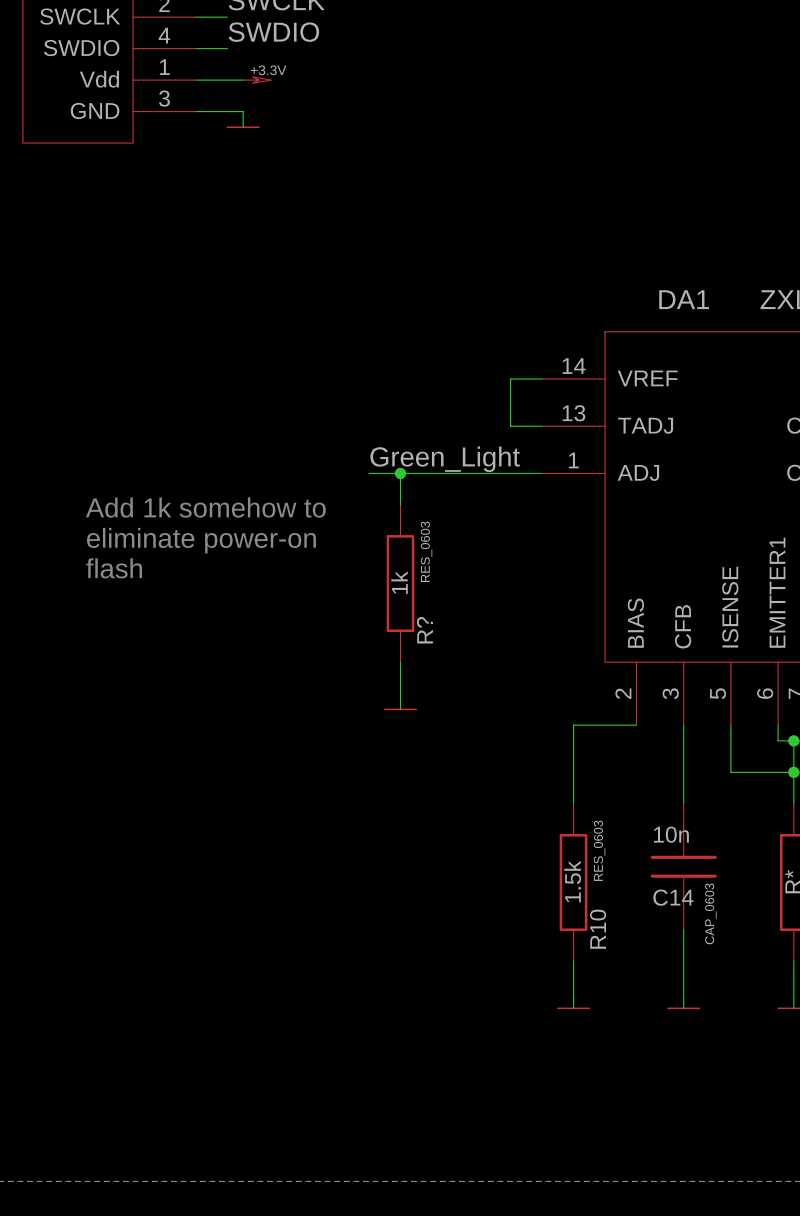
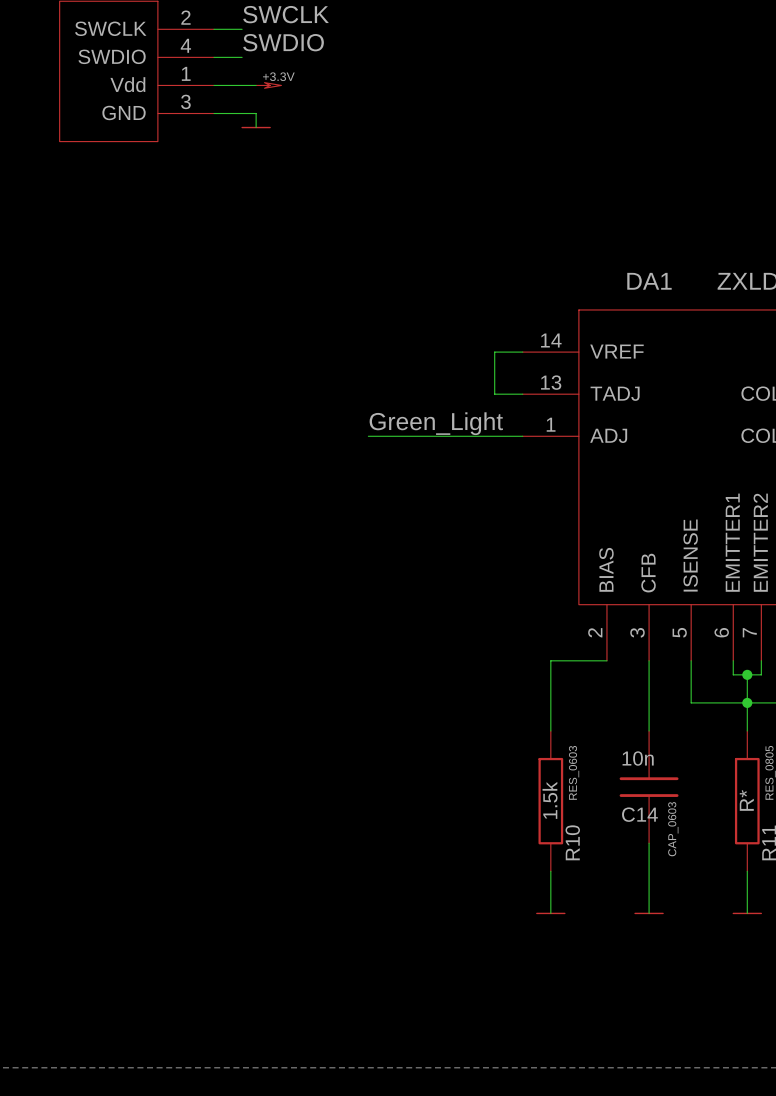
wire: (400, 473) (400, 504) -> none
junction: (400, 473) -> none
text: Add 1k somehow to (205, 507) -> none
text: eliminate power-on (201, 540) -> none
text: flash (114, 568) -> none
R?: 1k (400, 583) -> none
wire: (400, 662) (400, 709) -> none
power symbol: (400, 709) -> none

